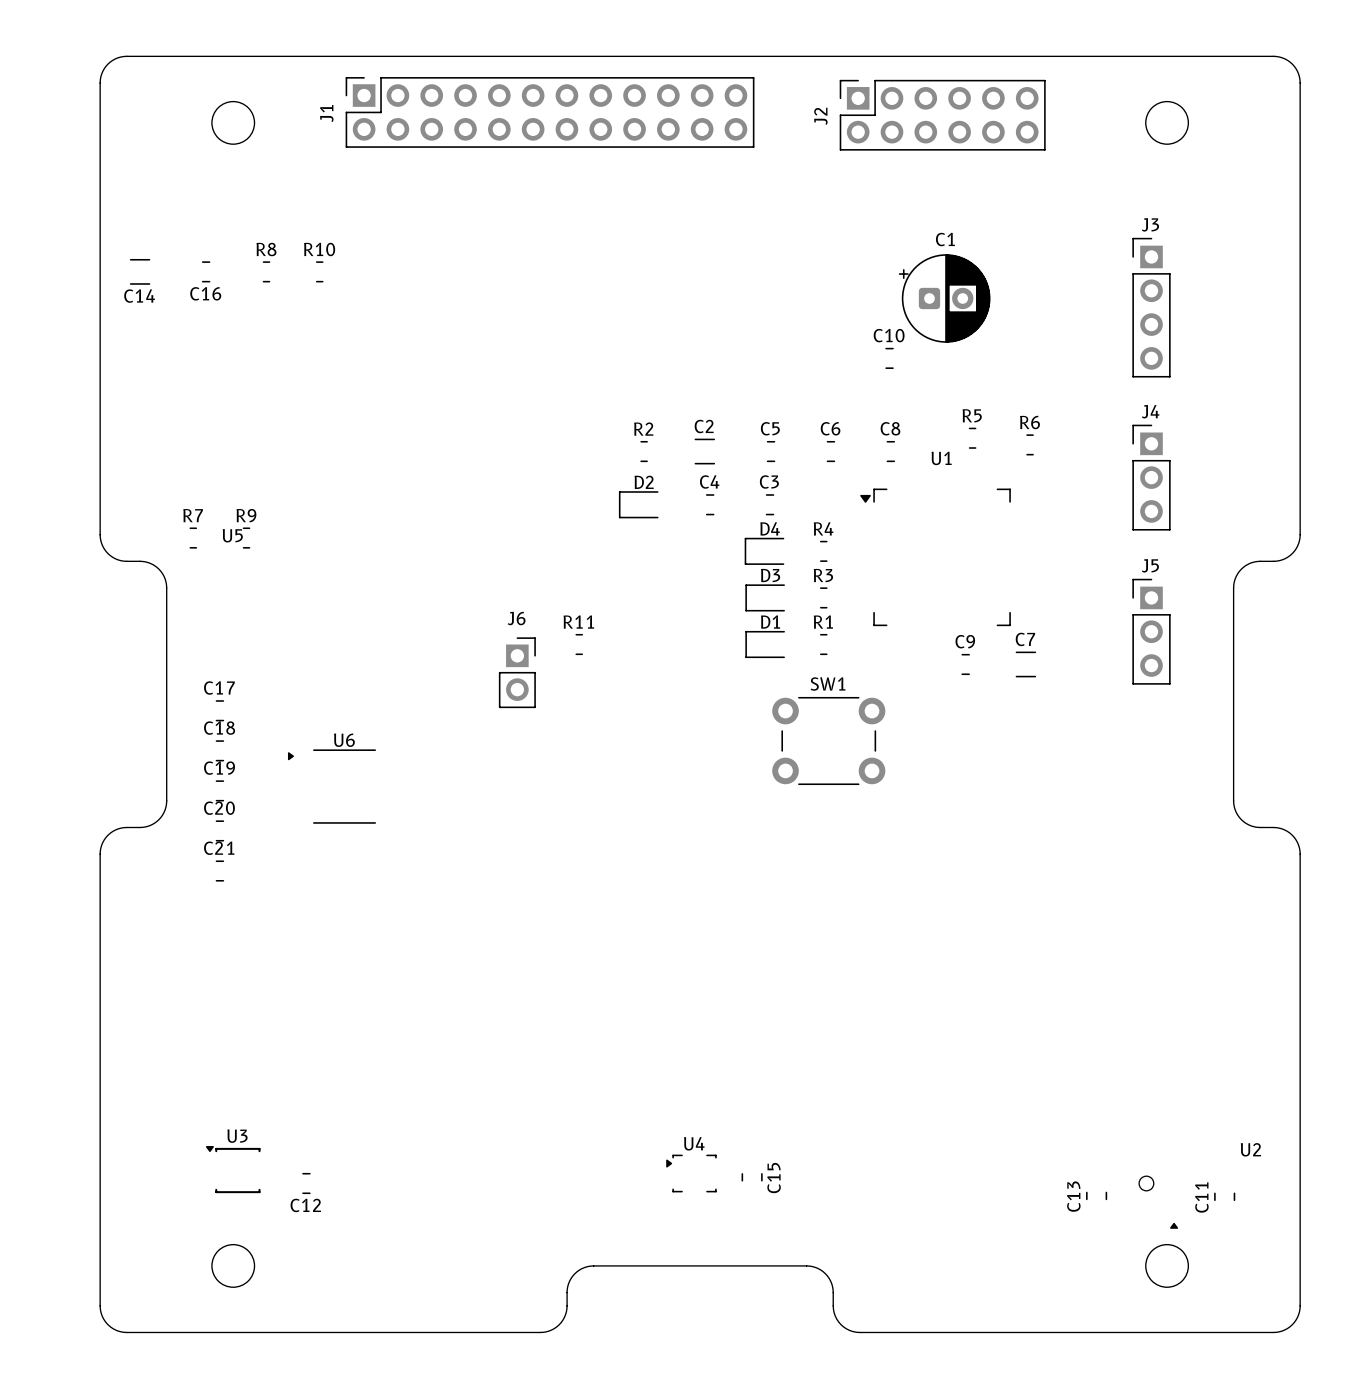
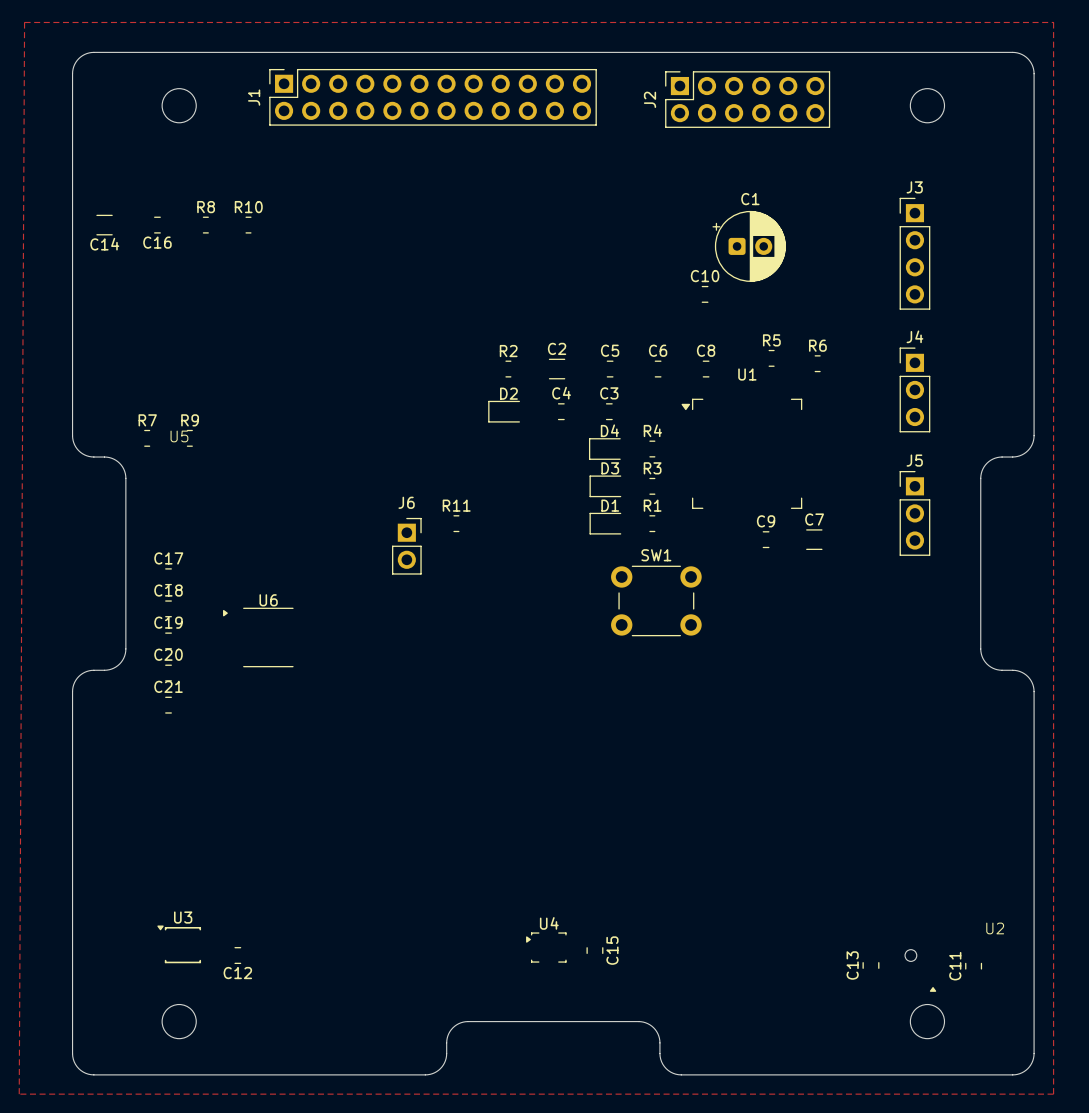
zone outline: none -> (24, 22) (19, 1094) (1053, 1094) (1053, 22) (24, 22)

